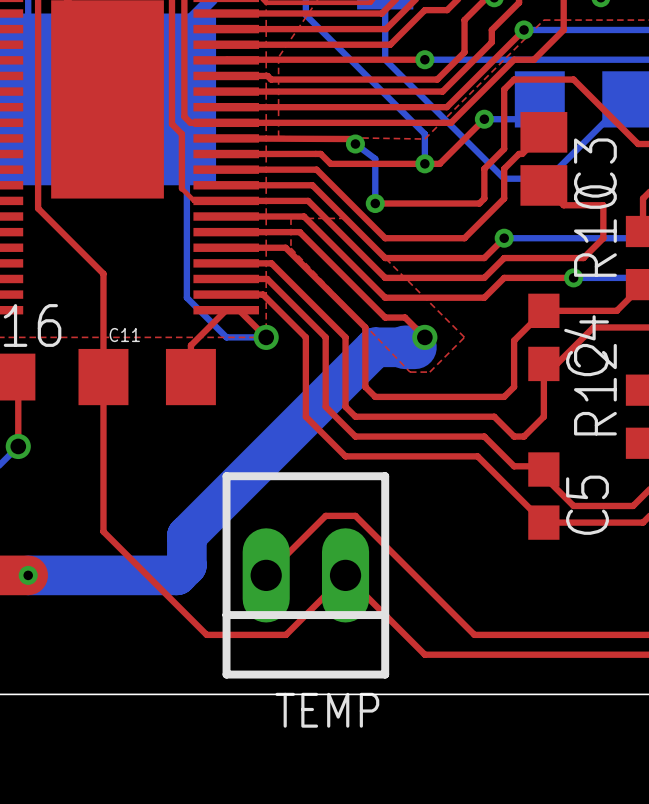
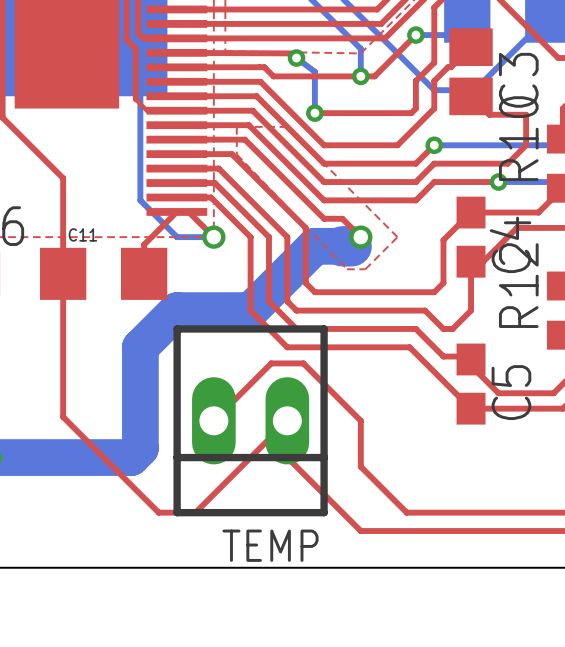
bottom track: (305, 416) (186, 535) -> (250, 310) (177, 310) (140, 347) (140, 420)
top track: (266, 575) (325, 515) (355, 515) (424, 585) -> (213, 420) (271, 363) (303, 363) (360, 420) (360, 466)
TEMP position: (305, 575) -> (250, 420)
top track: (345, 575) (286, 634) (246, 634) -> (287, 457) (287, 420) (195, 512)

